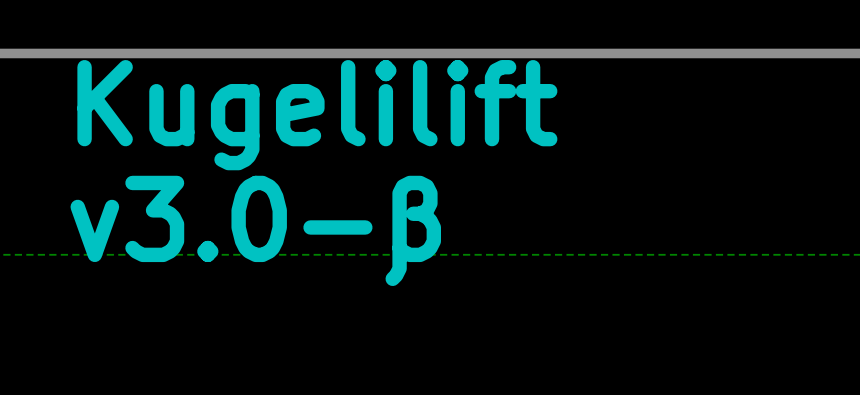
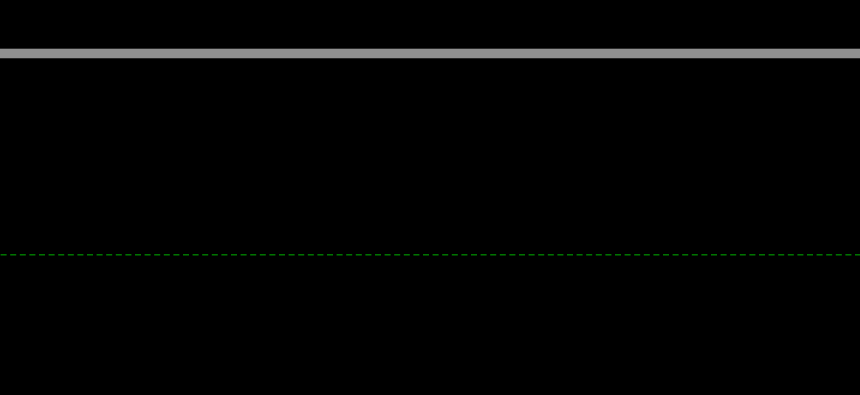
text: Kugelilift (317, 115) -> none
text: v3.0-β (255, 230) -> none

